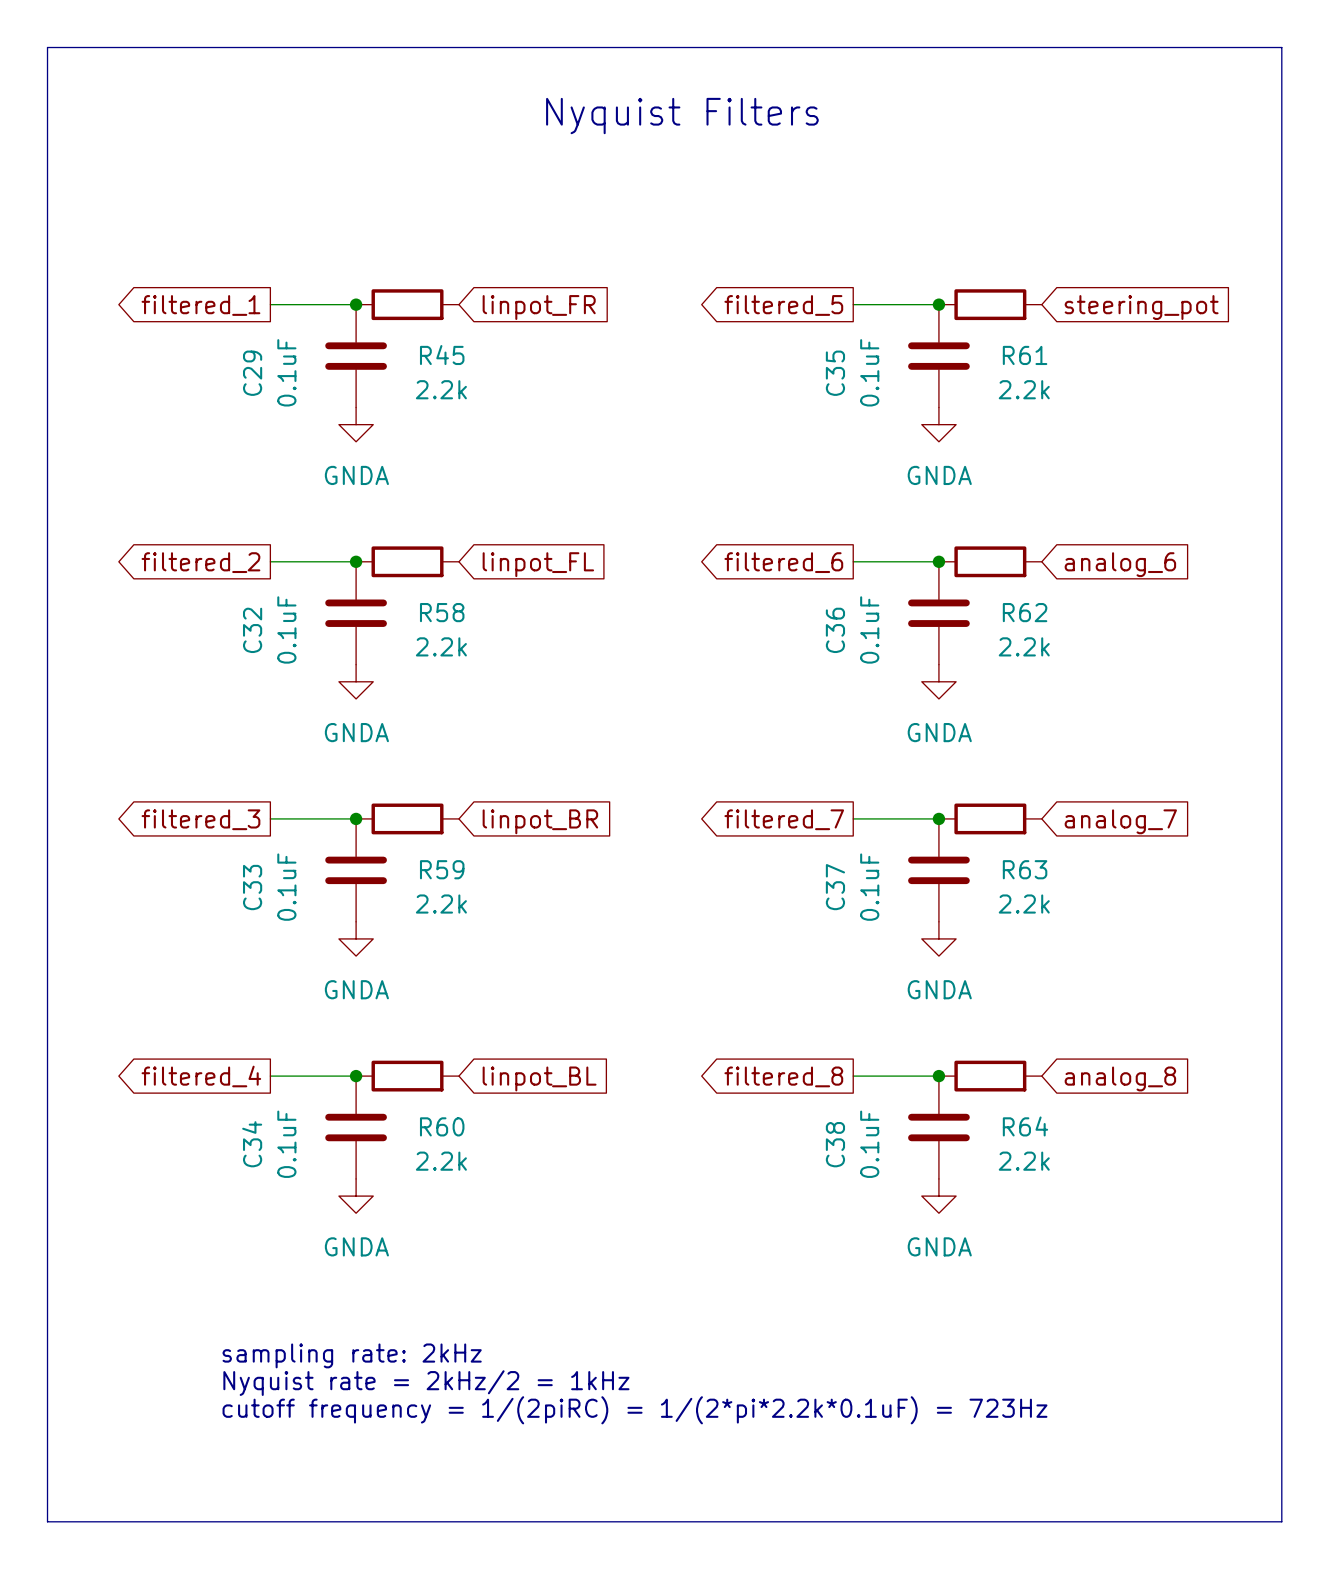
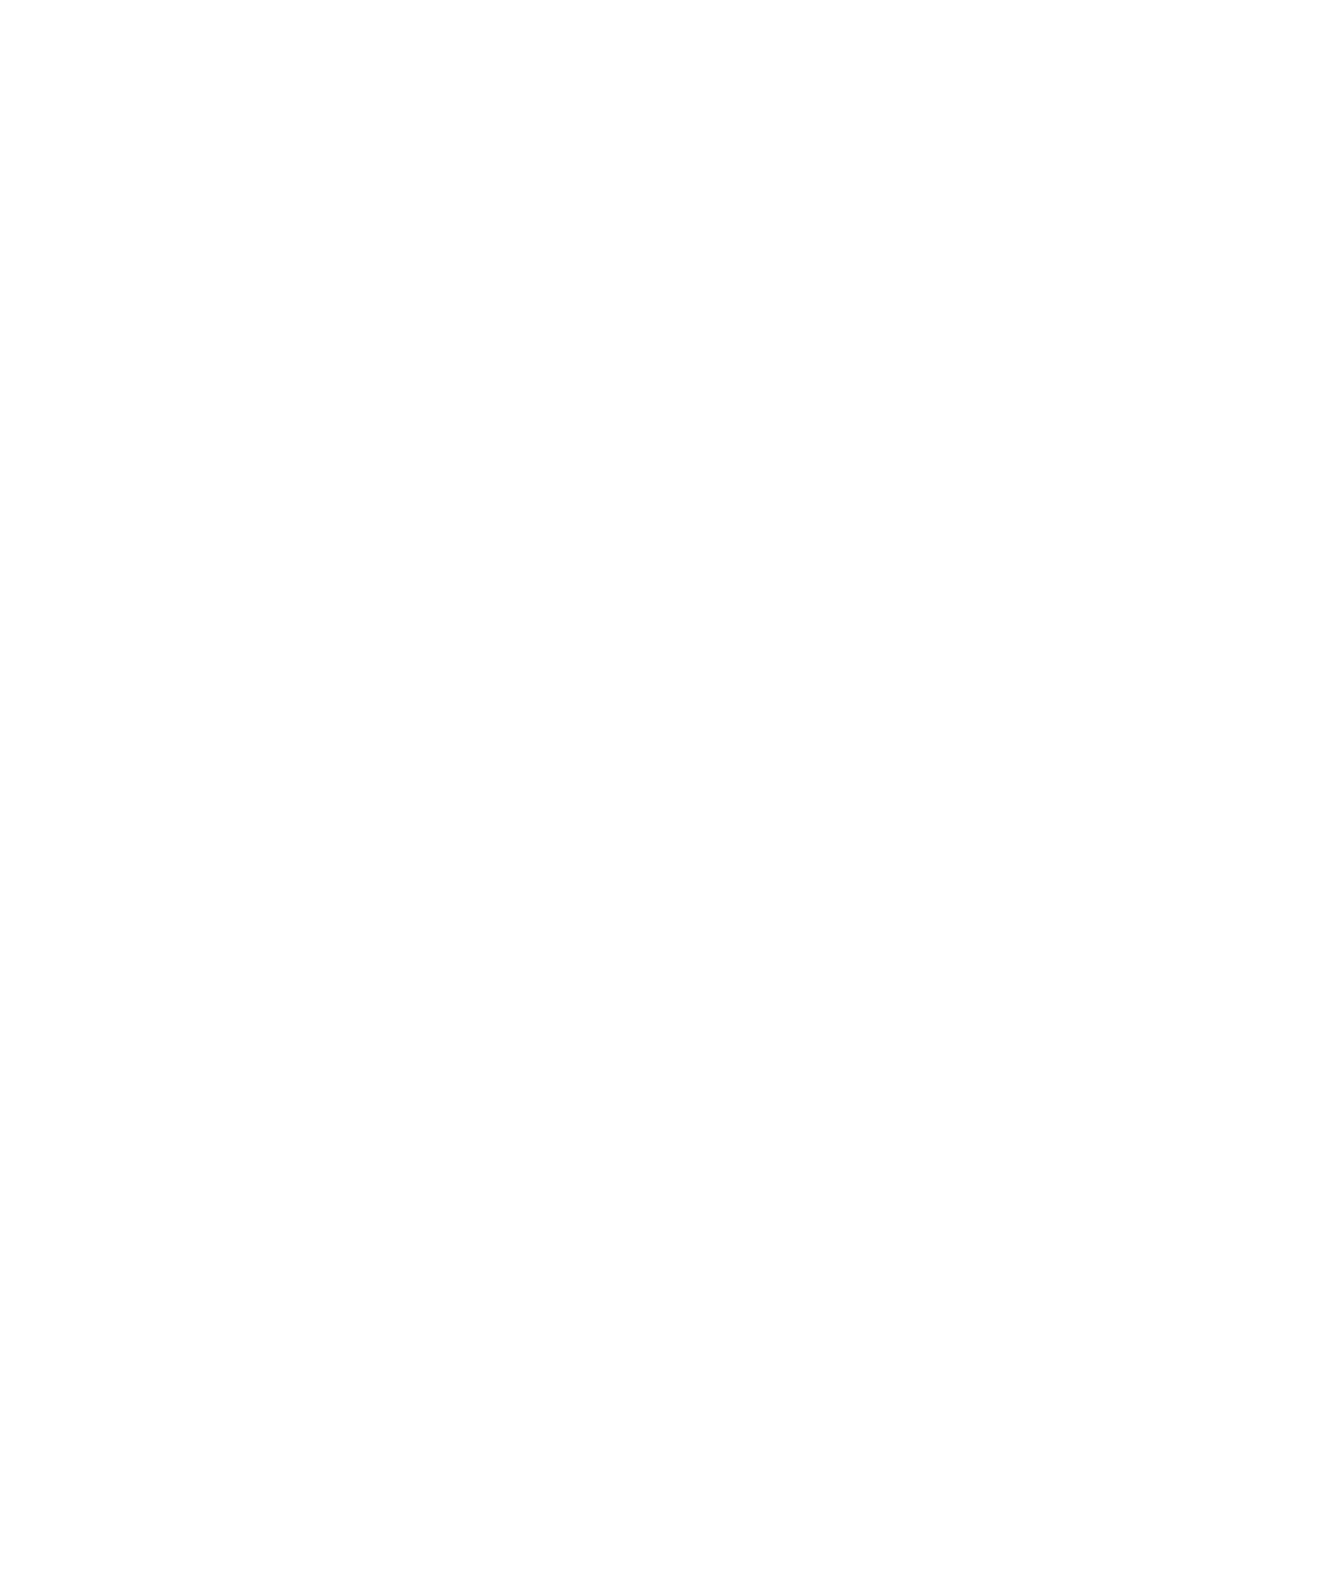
line: (47, 47) (1281, 47) (1281, 1521) (47, 1521) (47, 47) -> none
text: Nyquist Filters (682, 116) -> none
wire: (270, 304) (356, 304) -> none
junction: (356, 304) -> none
R45: 2.2k (407, 304) -> none
wire: (853, 304) (938, 304) -> none
junction: (938, 304) -> none
R61: 2.2k (990, 304) -> none
global label: filtered_1 (200, 305) -> none
global label: filtered_5 (783, 305) -> none
global label: linpot_FR (539, 307) -> none
global label: steering_pot (1141, 307) -> none
C29: 0.1uF (356, 356) -> none
C35: 0.1uF (938, 356) -> none
power symbol: GNDA (356, 424) -> none
power symbol: GNDA (938, 424) -> none
wire: (270, 561) (356, 561) -> none
junction: (356, 561) -> none
R58: 2.2k (407, 561) -> none
wire: (853, 561) (938, 561) -> none
junction: (938, 561) -> none
R62: 2.2k (990, 561) -> none
global label: filtered_2 (200, 562) -> none
global label: filtered_6 (783, 562) -> none
global label: linpot_FL (538, 564) -> none
global label: analog_6 (1120, 564) -> none
C32: 0.1uF (356, 613) -> none
C36: 0.1uF (938, 613) -> none
power symbol: GNDA (356, 681) -> none
power symbol: GNDA (938, 681) -> none
wire: (270, 818) (356, 818) -> none
junction: (356, 818) -> none
R59: 2.2k (407, 818) -> none
wire: (853, 818) (938, 818) -> none
junction: (938, 818) -> none
R63: 2.2k (990, 818) -> none
global label: filtered_3 (200, 819) -> none
global label: filtered_7 (784, 819) -> none
global label: linpot_BR (540, 821) -> none
global label: analog_7 (1120, 821) -> none
C33: 0.1uF (356, 870) -> none
C37: 0.1uF (938, 870) -> none
power symbol: GNDA (356, 938) -> none
power symbol: GNDA (938, 938) -> none
global label: filtered_4 (201, 1076) -> none
wire: (270, 1076) (356, 1076) -> none
junction: (356, 1076) -> none
R60: 2.2k (407, 1076) -> none
global label: filtered_8 (783, 1076) -> none
wire: (853, 1076) (938, 1076) -> none
junction: (938, 1076) -> none
R64: 2.2k (990, 1076) -> none
global label: linpot_BL (539, 1078) -> none
global label: analog_8 (1120, 1078) -> none
C34: 0.1uF (356, 1127) -> none
C38: 0.1uF (938, 1127) -> none
power symbol: GNDA (356, 1196) -> none
power symbol: GNDA (938, 1196) -> none
text: sampling rate: 2kHz (352, 1355) -> none
text: Nyquist rate = 2kHz/2 = 1kHz (426, 1383) -> none
text: cutoff frequency = 1/(2piRC) = 1/(2*pi*2.2k*0.1uF) = 723Hz (634, 1410) -> none

